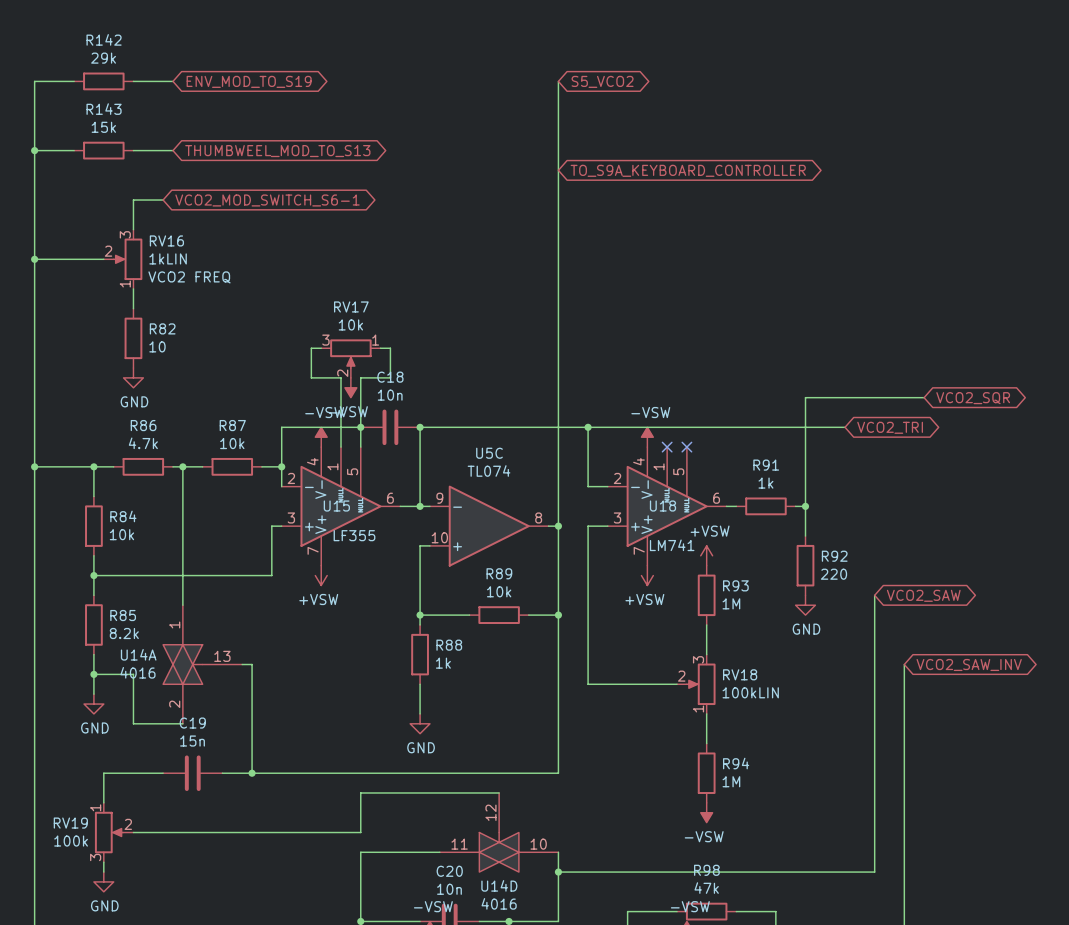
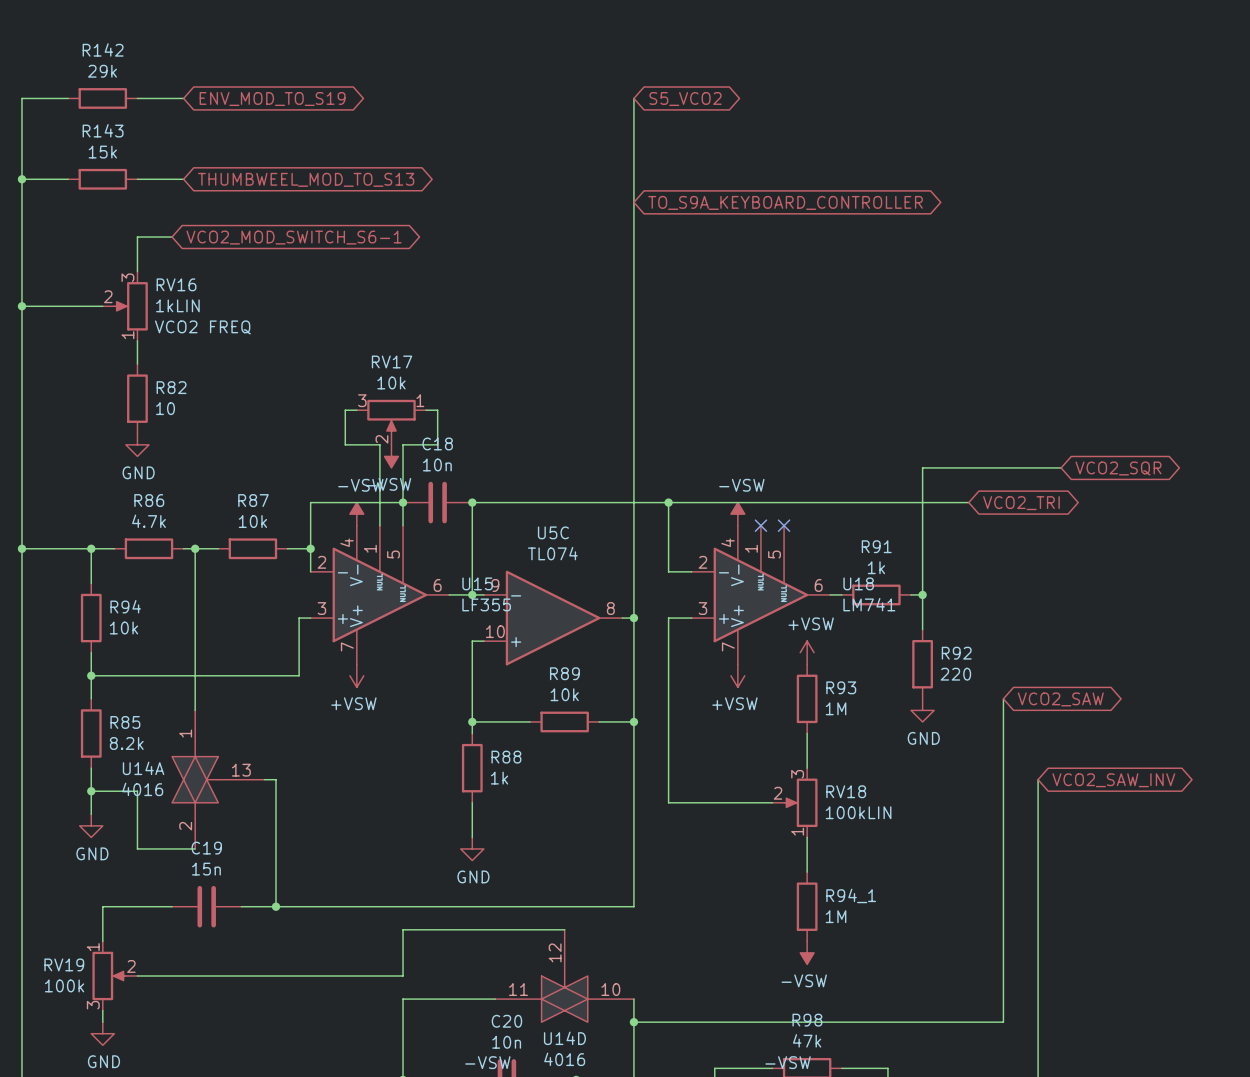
U15 name position: U15 (336, 506) -> U15 (477, 583)
U18 name position: U18 (662, 506) -> U18 (858, 583)
R84 name: R84 (123, 516) -> R94 (125, 606)
U15 value position: LF355 (354, 535) -> LF355 (486, 604)
U18 value position: LM741 (672, 545) -> LM741 (869, 604)
R94 name: R94 (736, 763) -> R94_1 (851, 895)

